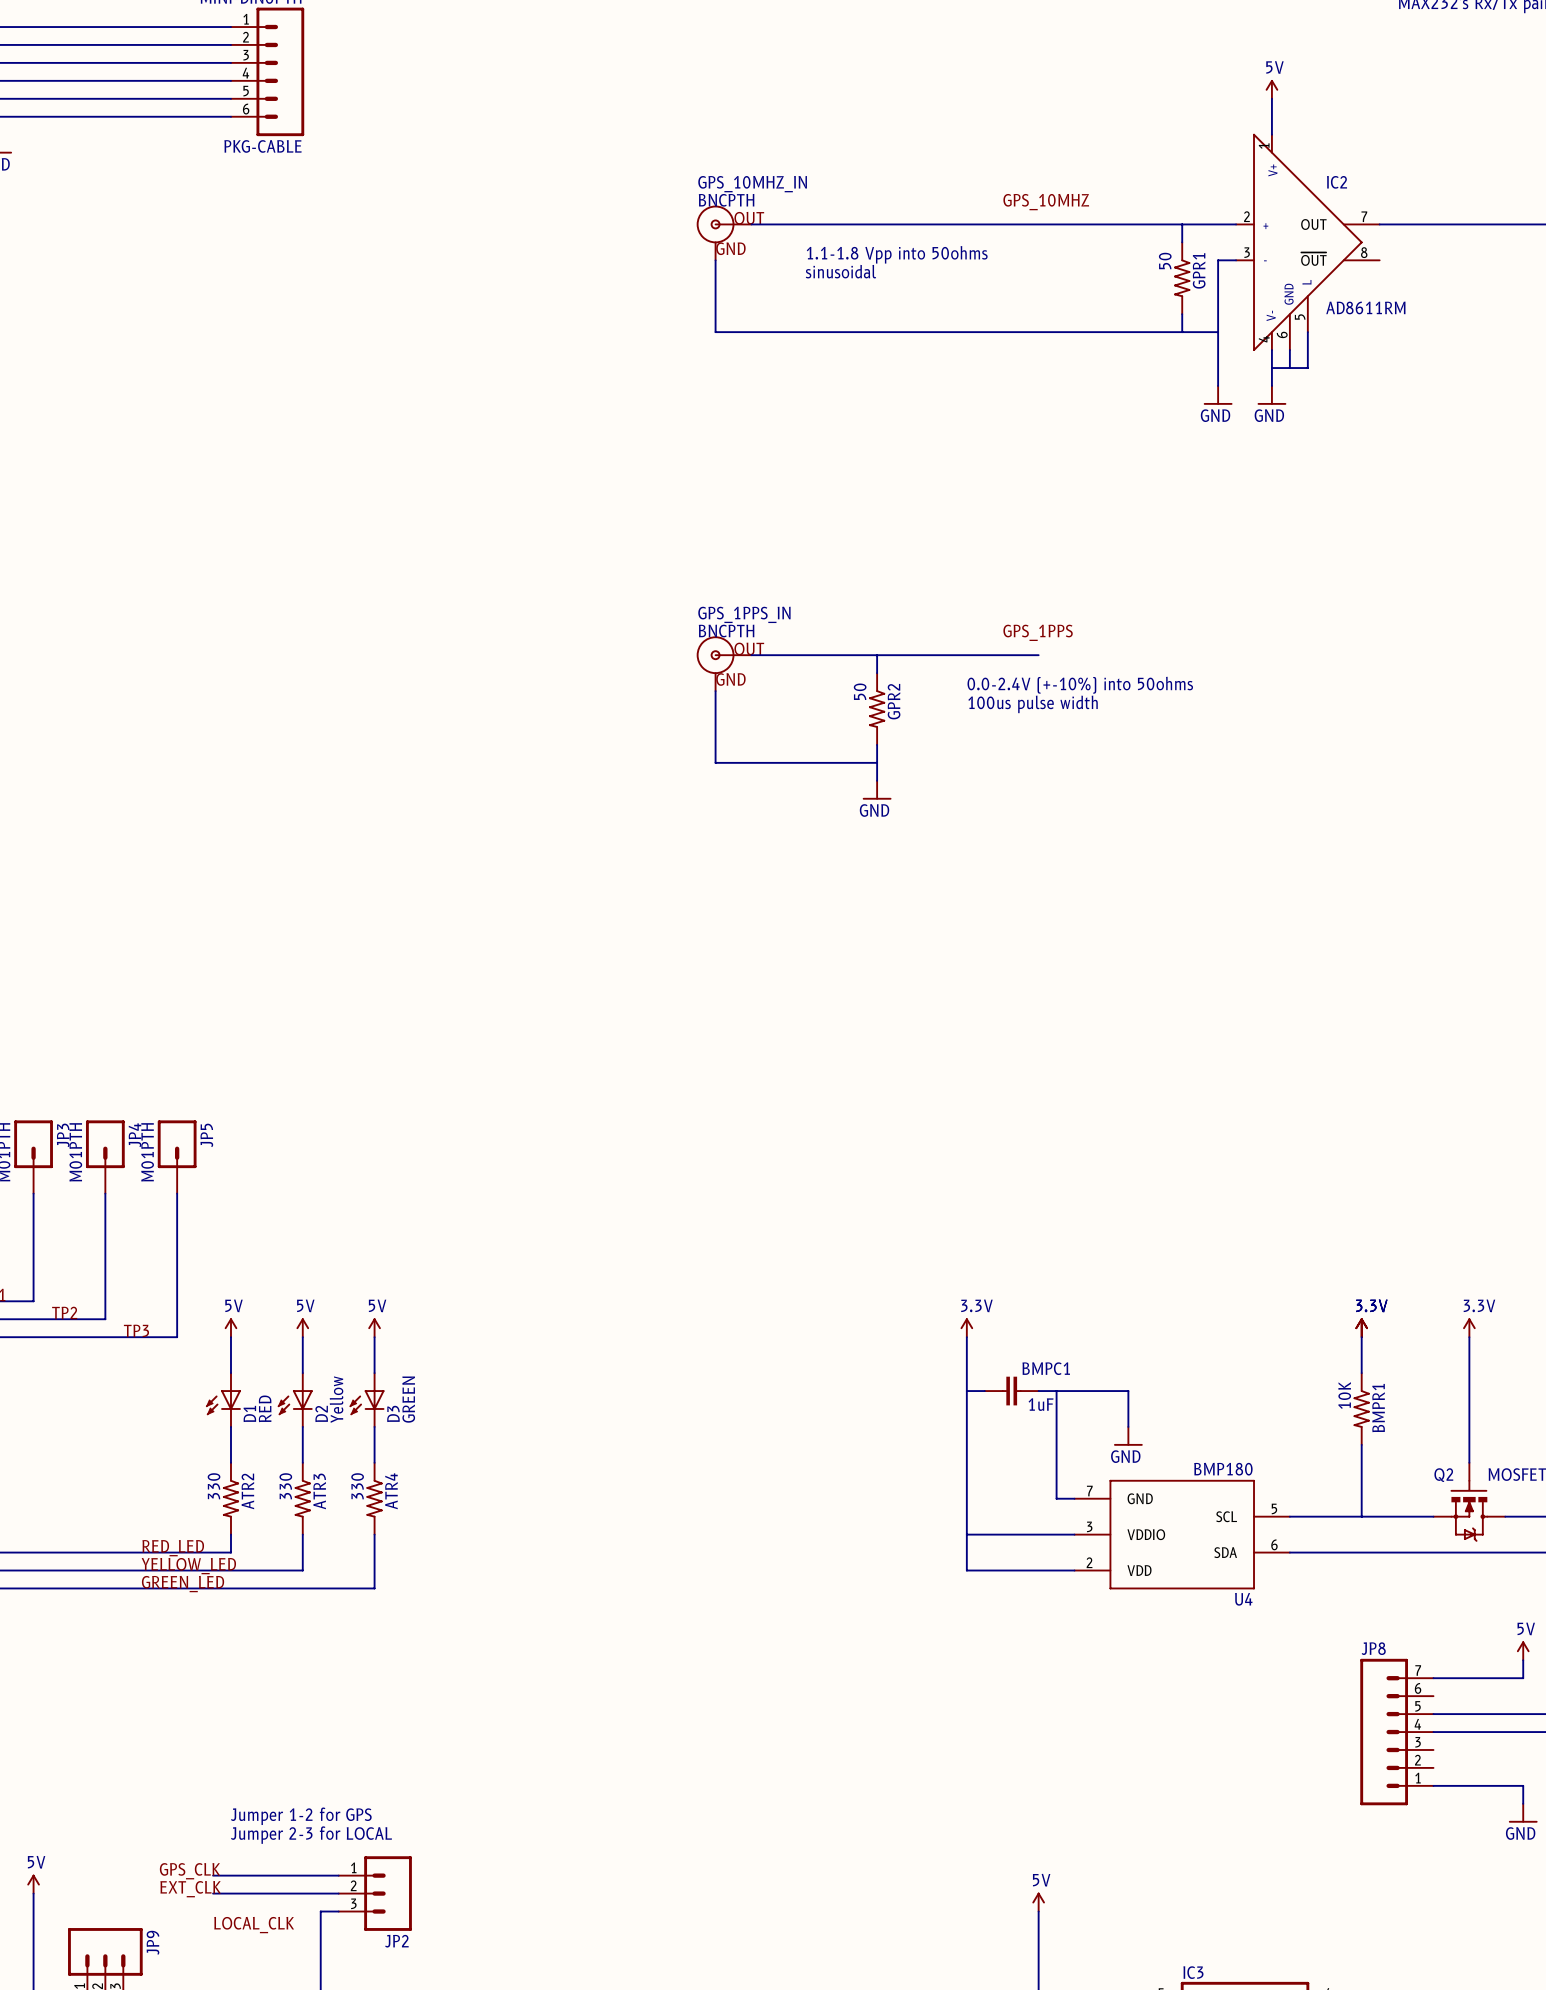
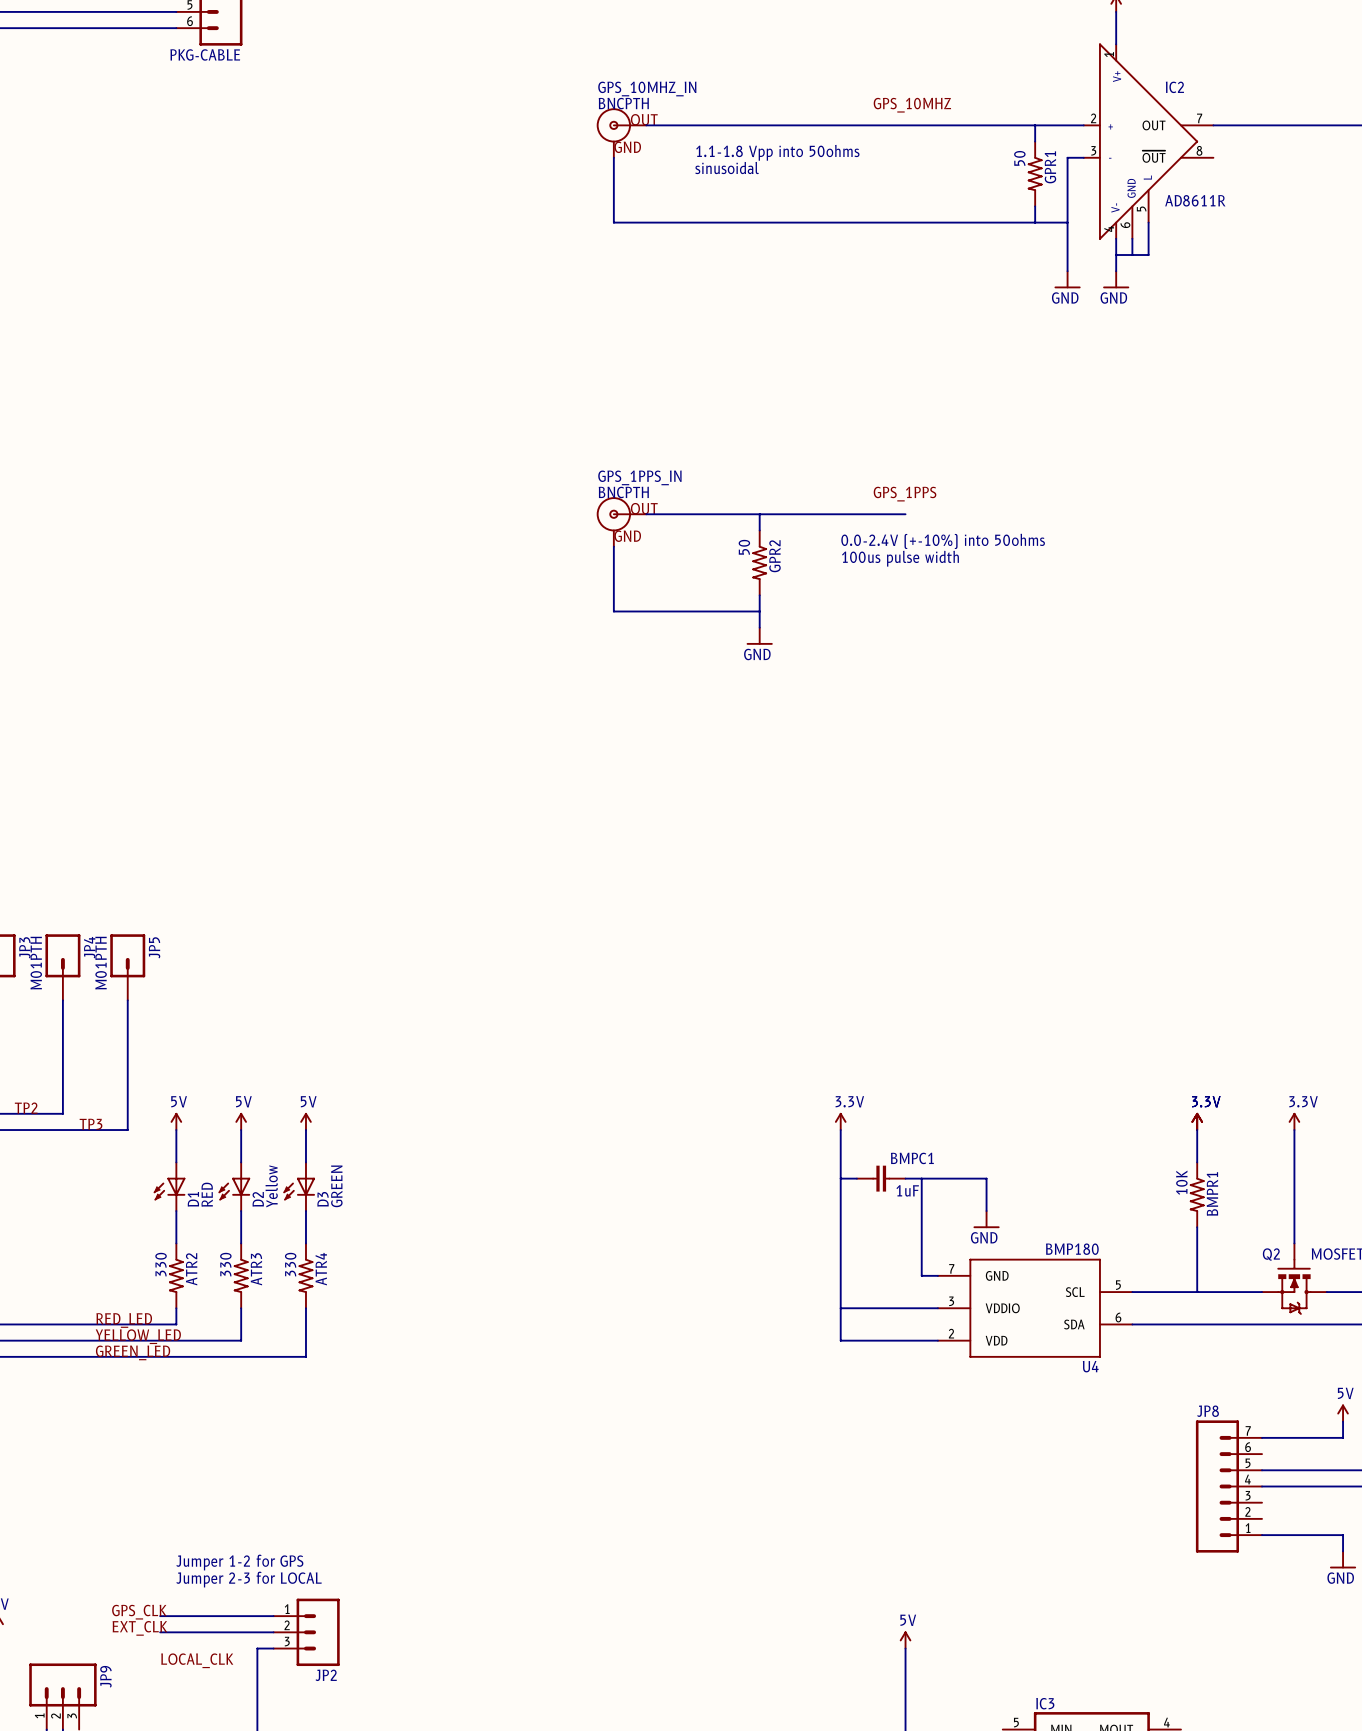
IC2 value: AD8611RM (1365, 307) -> AD8611R (1195, 200)

